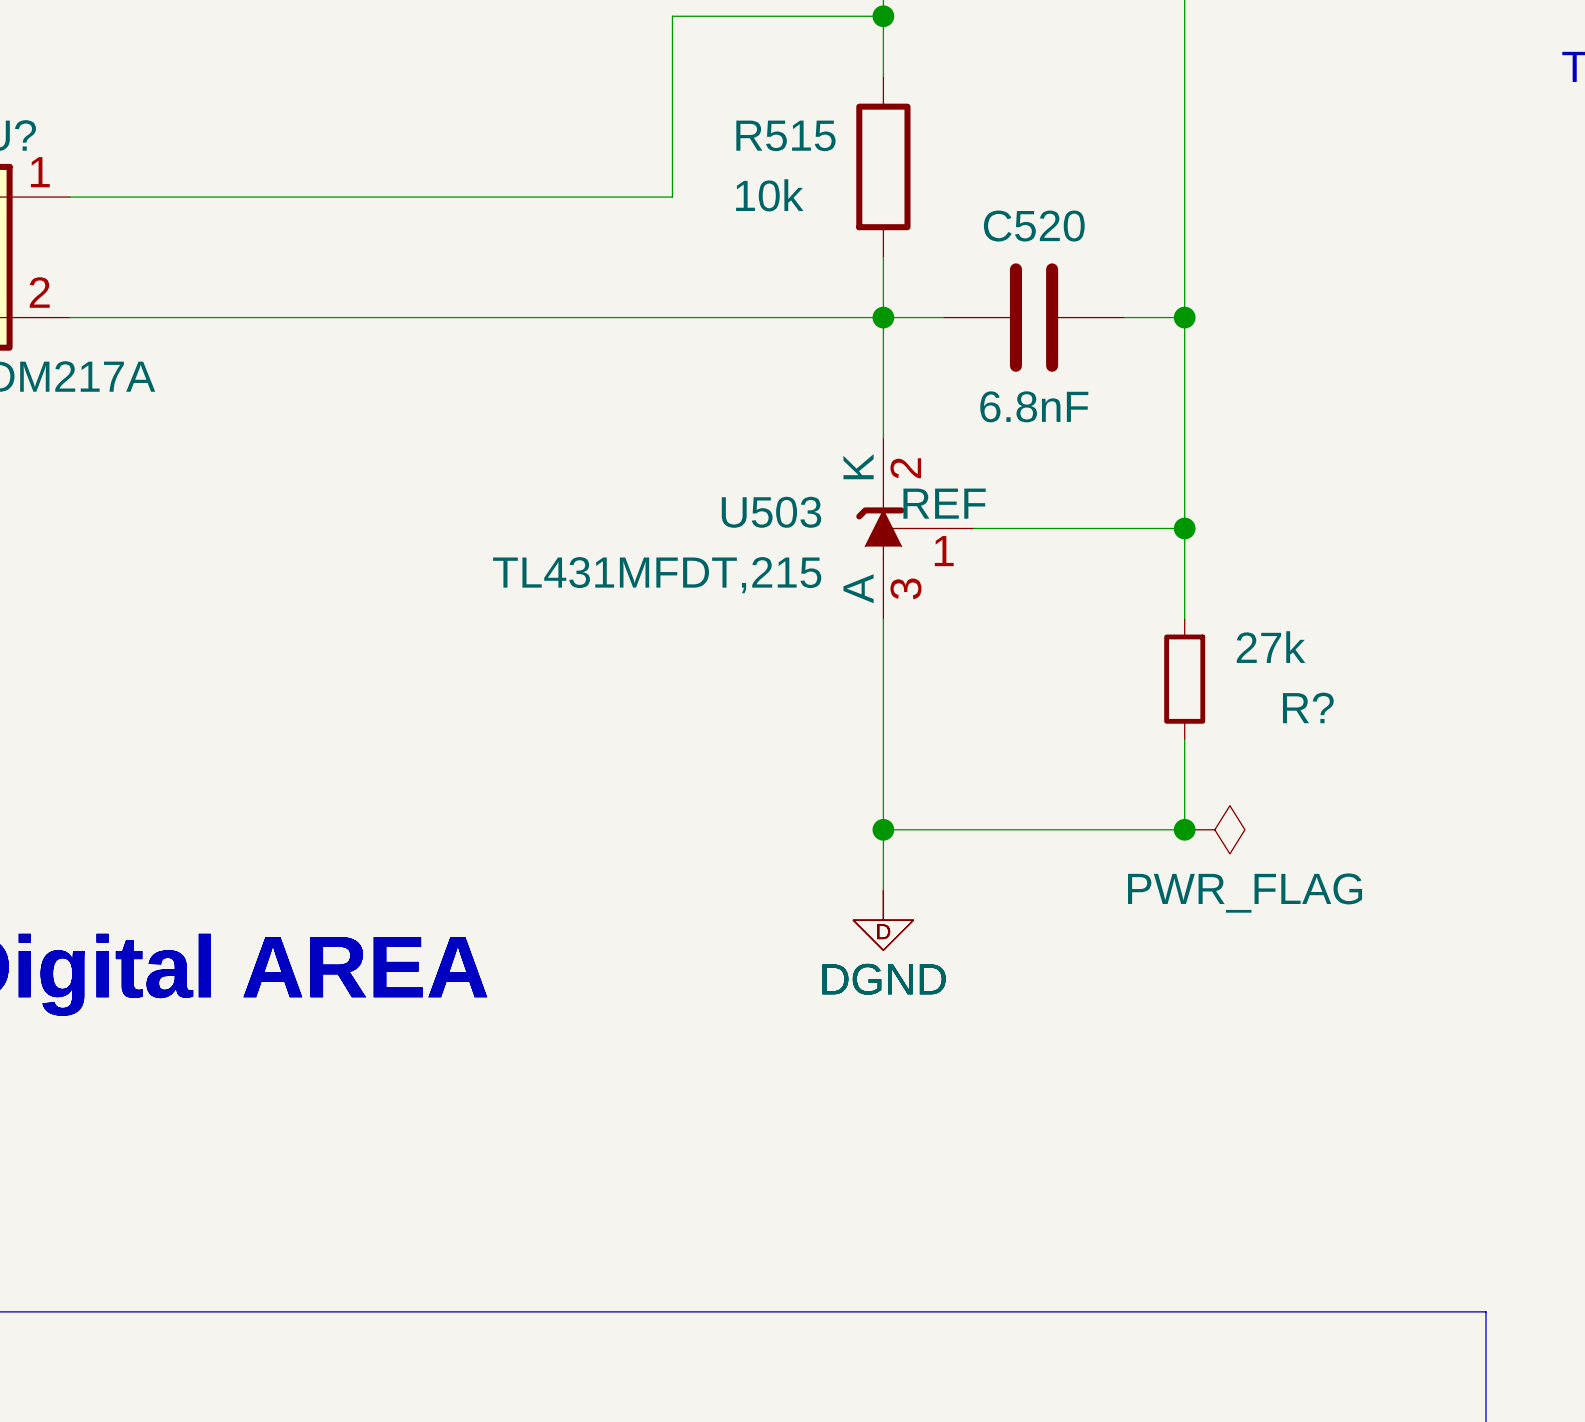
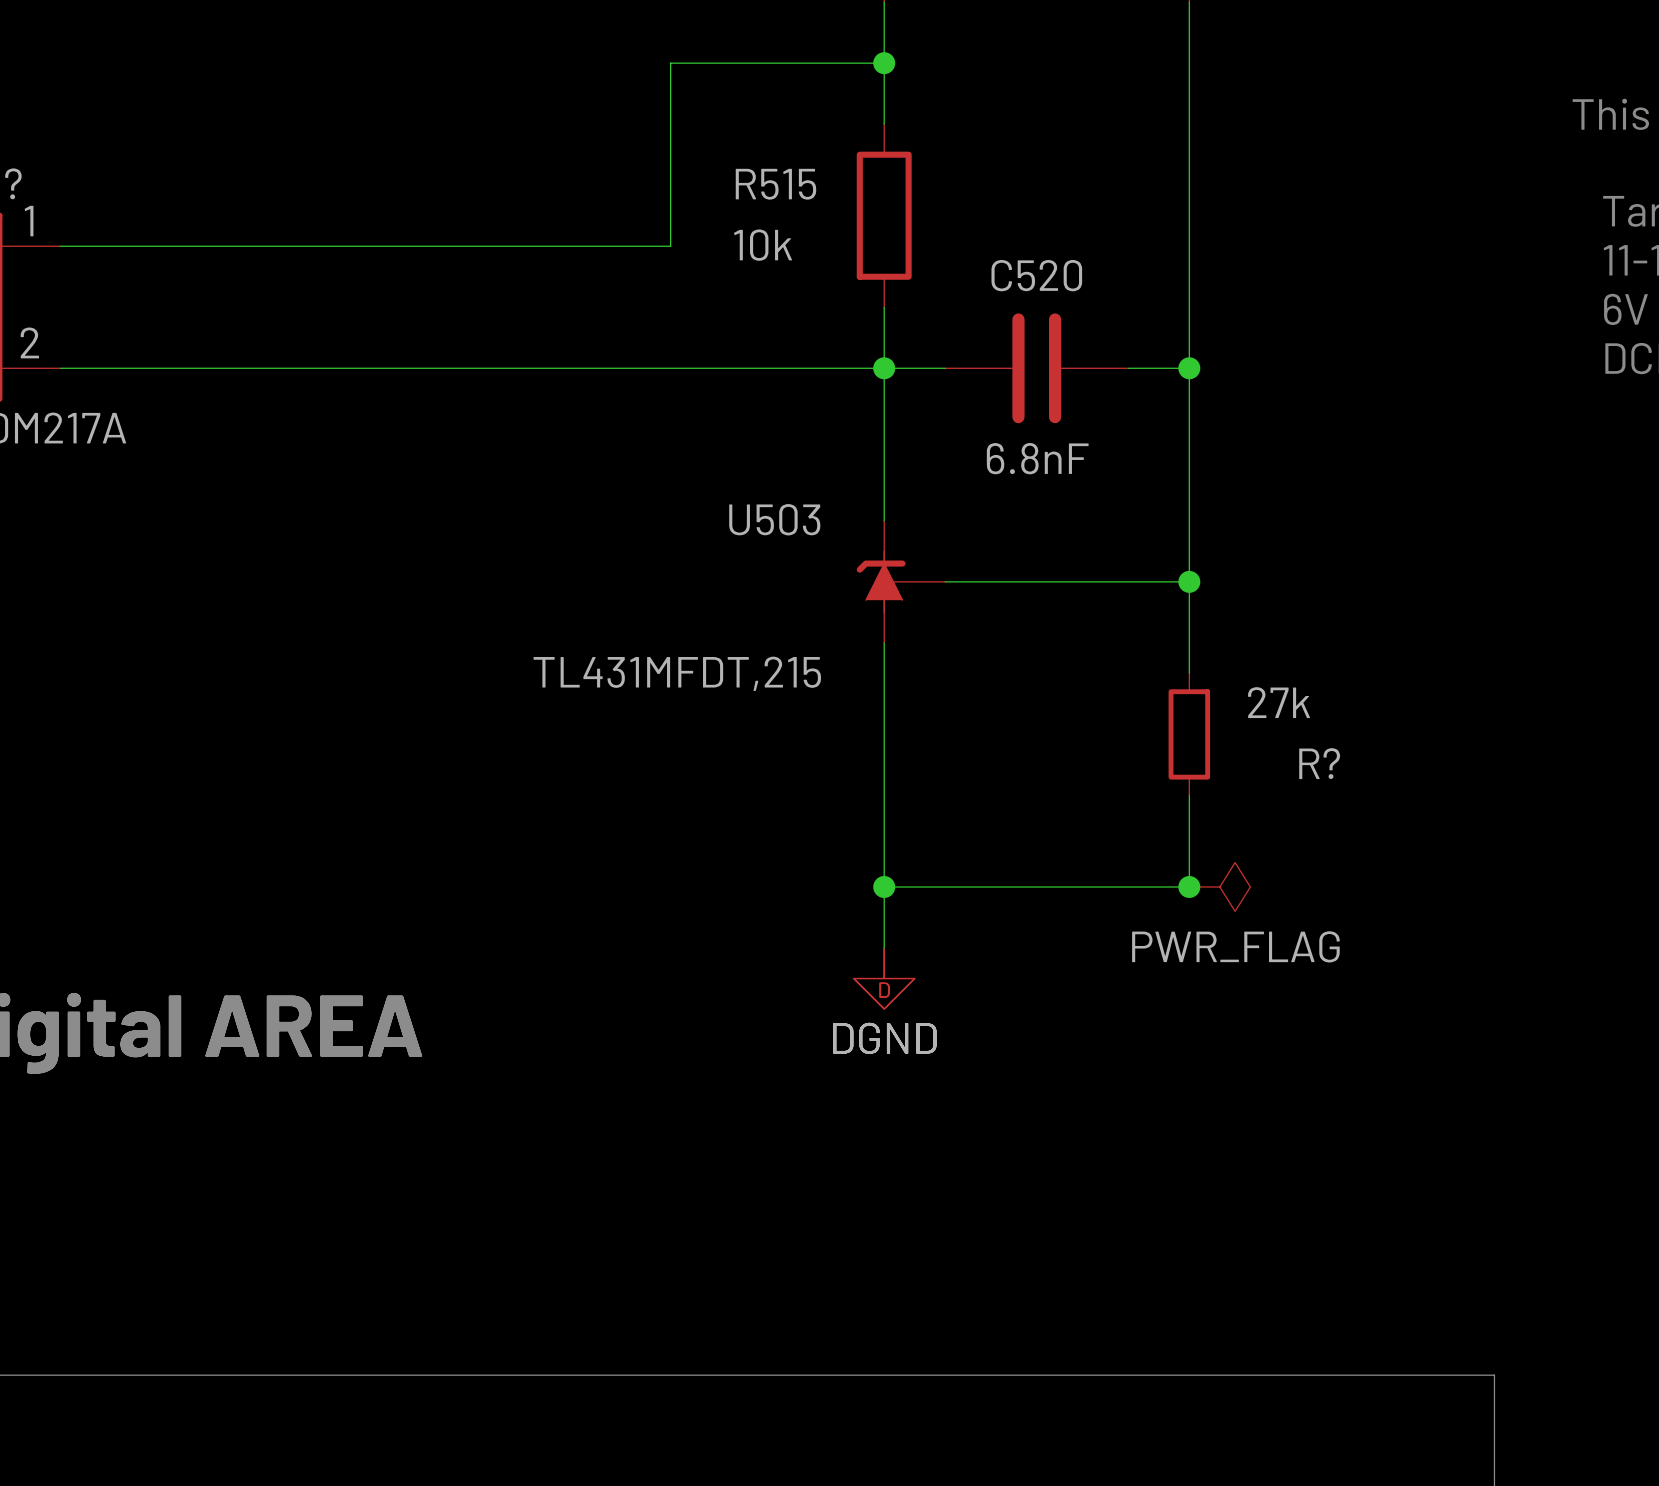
U503 symbol: [856, 438, 974, 619] -> [856, 520, 946, 643]
U503 name position: U503 (771, 512) -> U503 (774, 519)
U503 value position: TL431MFDT,215 (657, 575) -> TL431MFDT,215 (677, 673)

